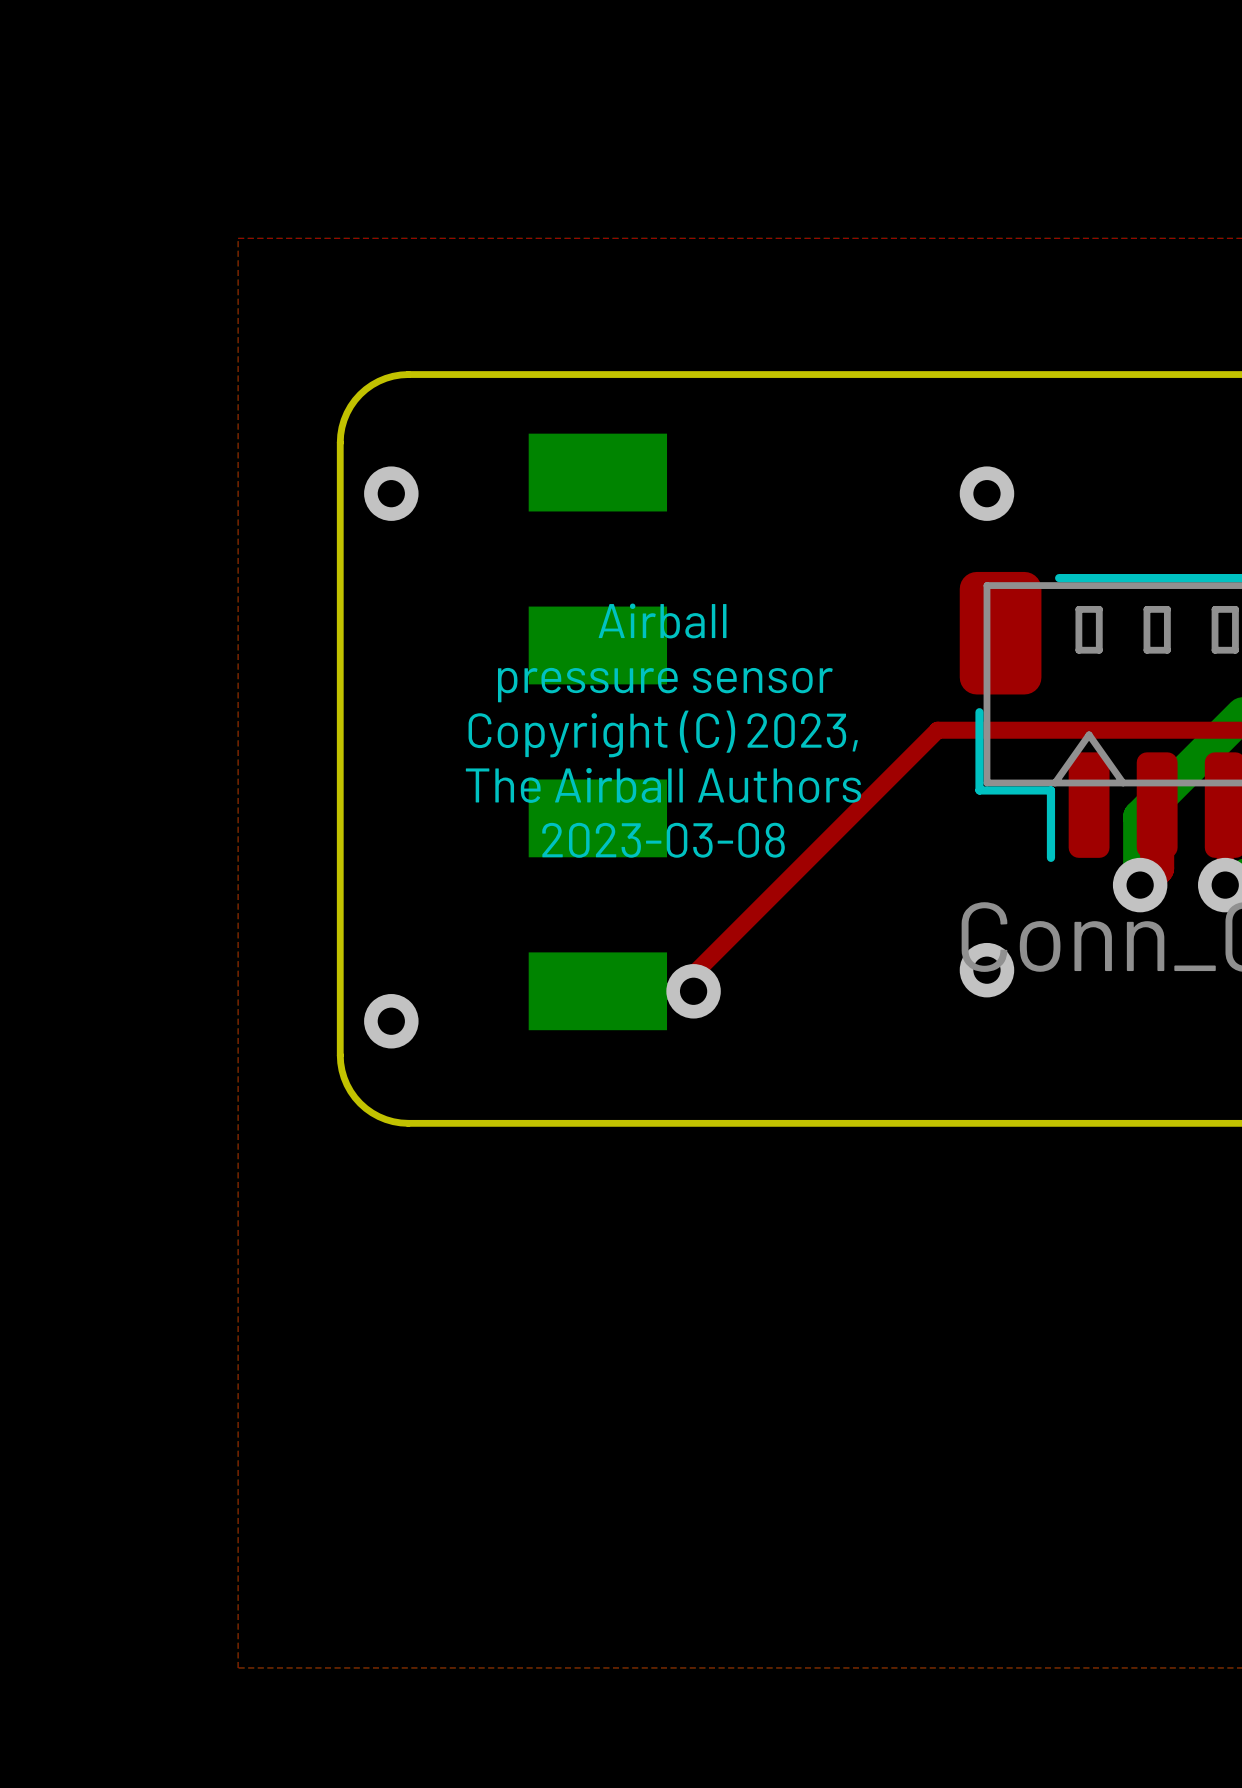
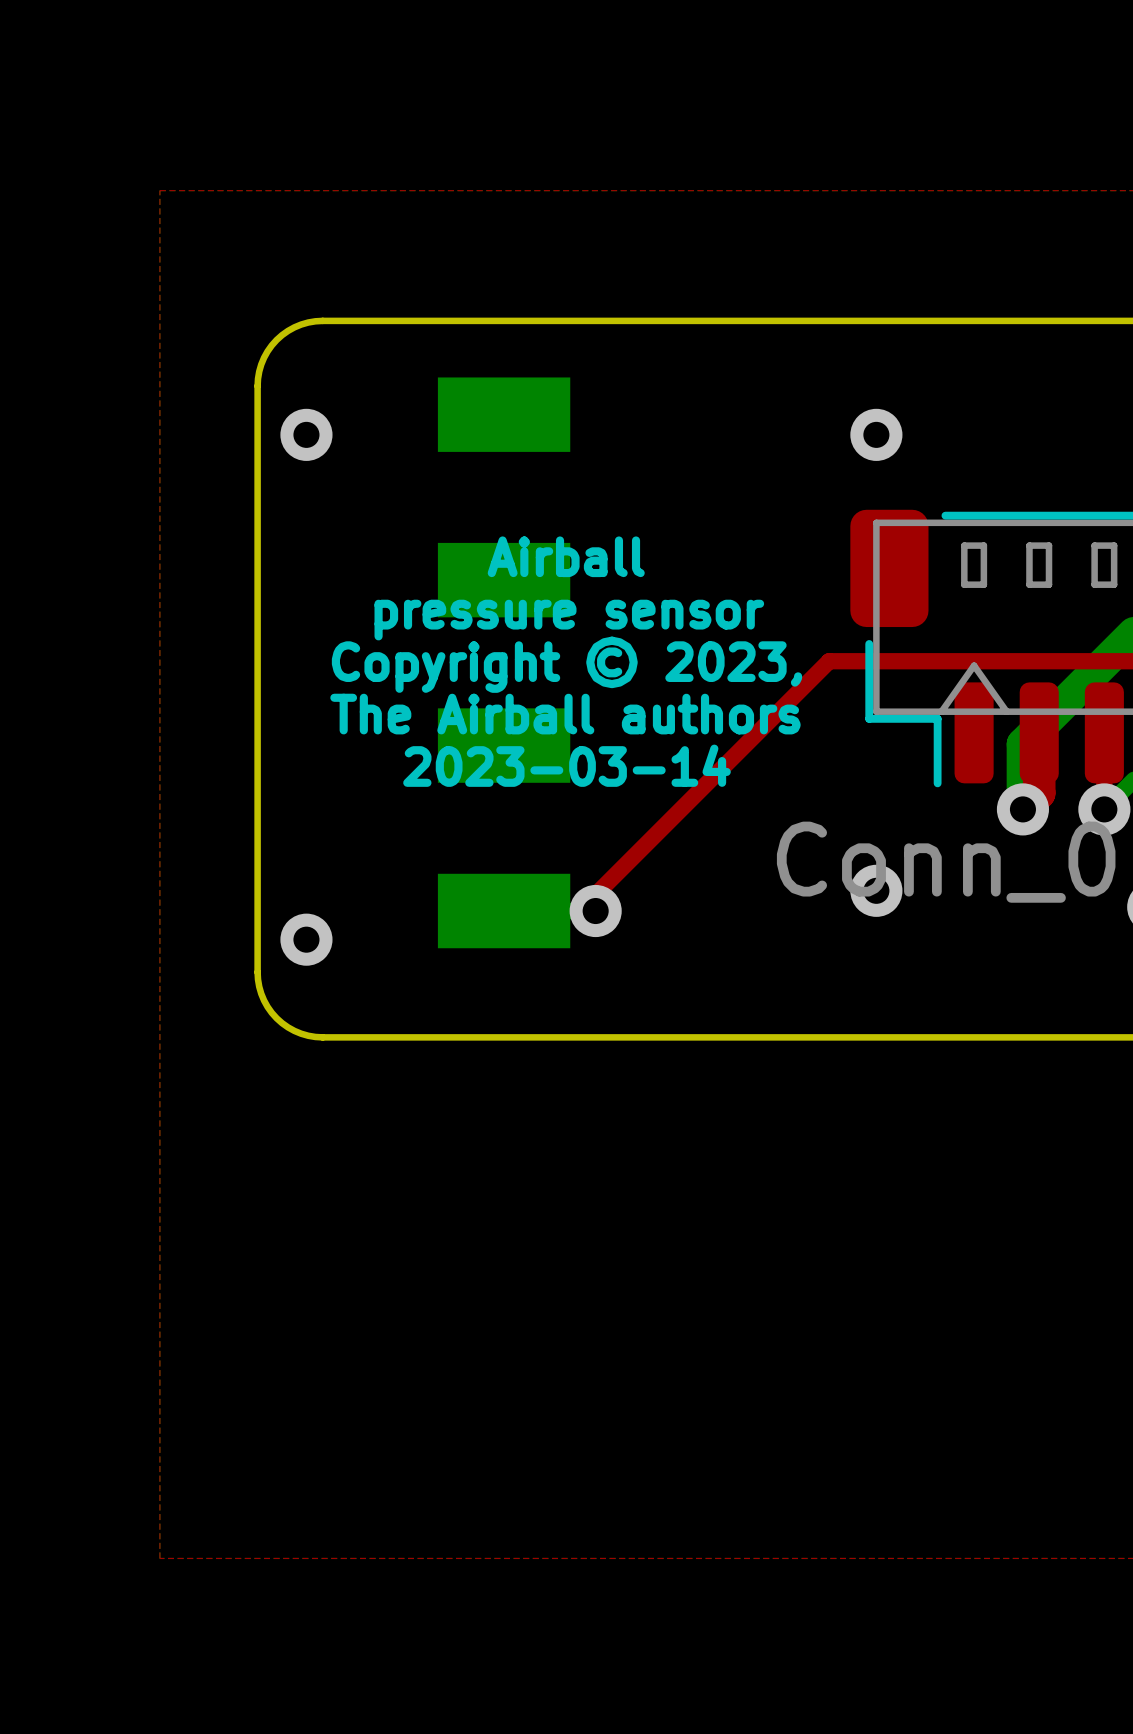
text: Copyright (C) 2023, (663, 733) -> Copyright © 2023, (567, 664)
text: The Airball Authors (663, 785) -> The Airball authors (565, 714)
text: 2023-03-08 (663, 840) -> 2023-03-14 (567, 765)

